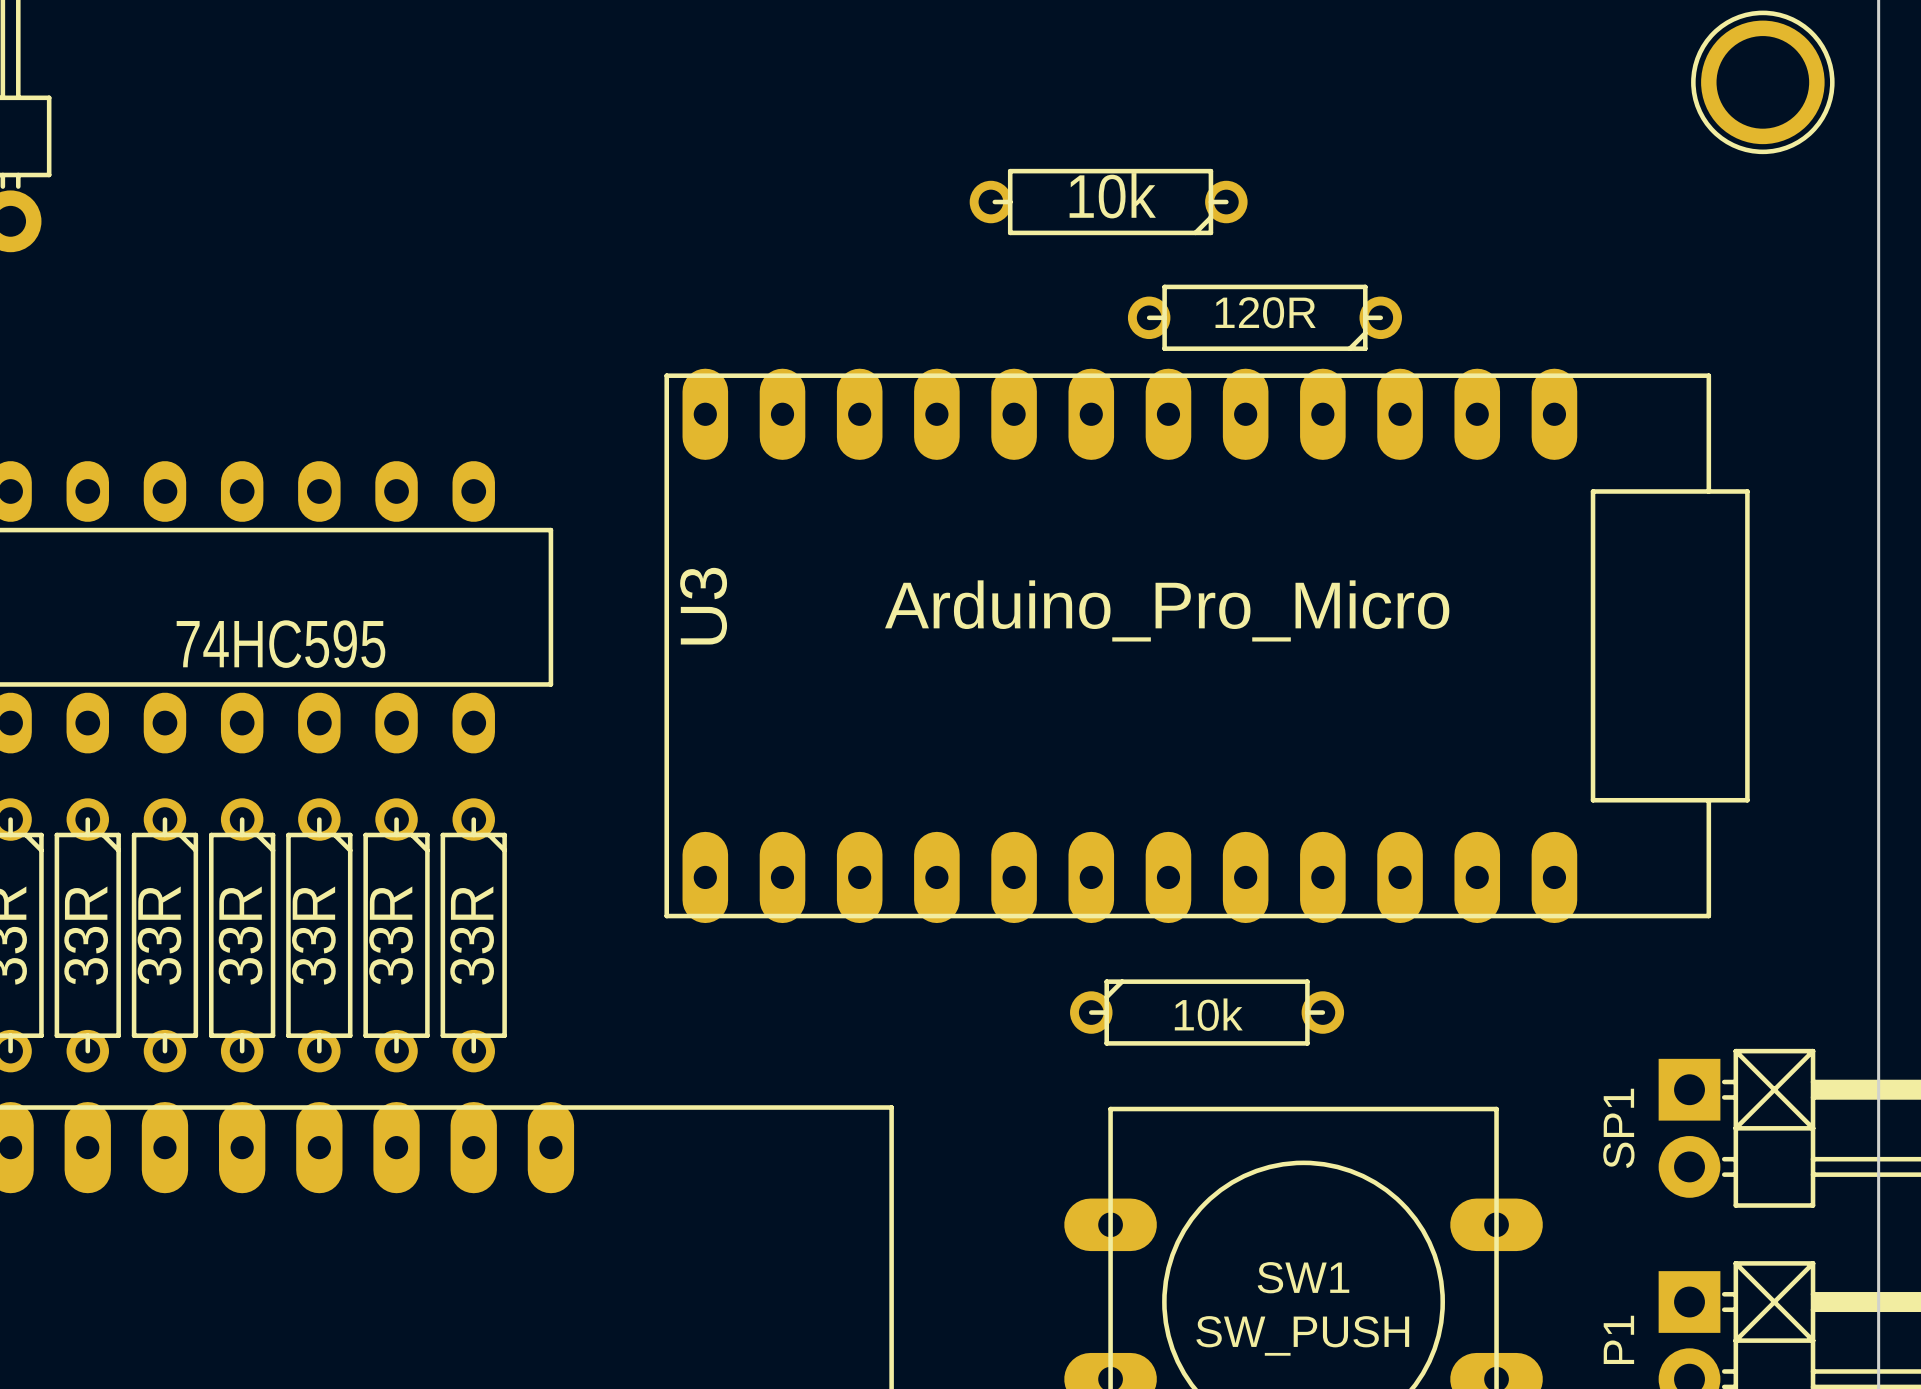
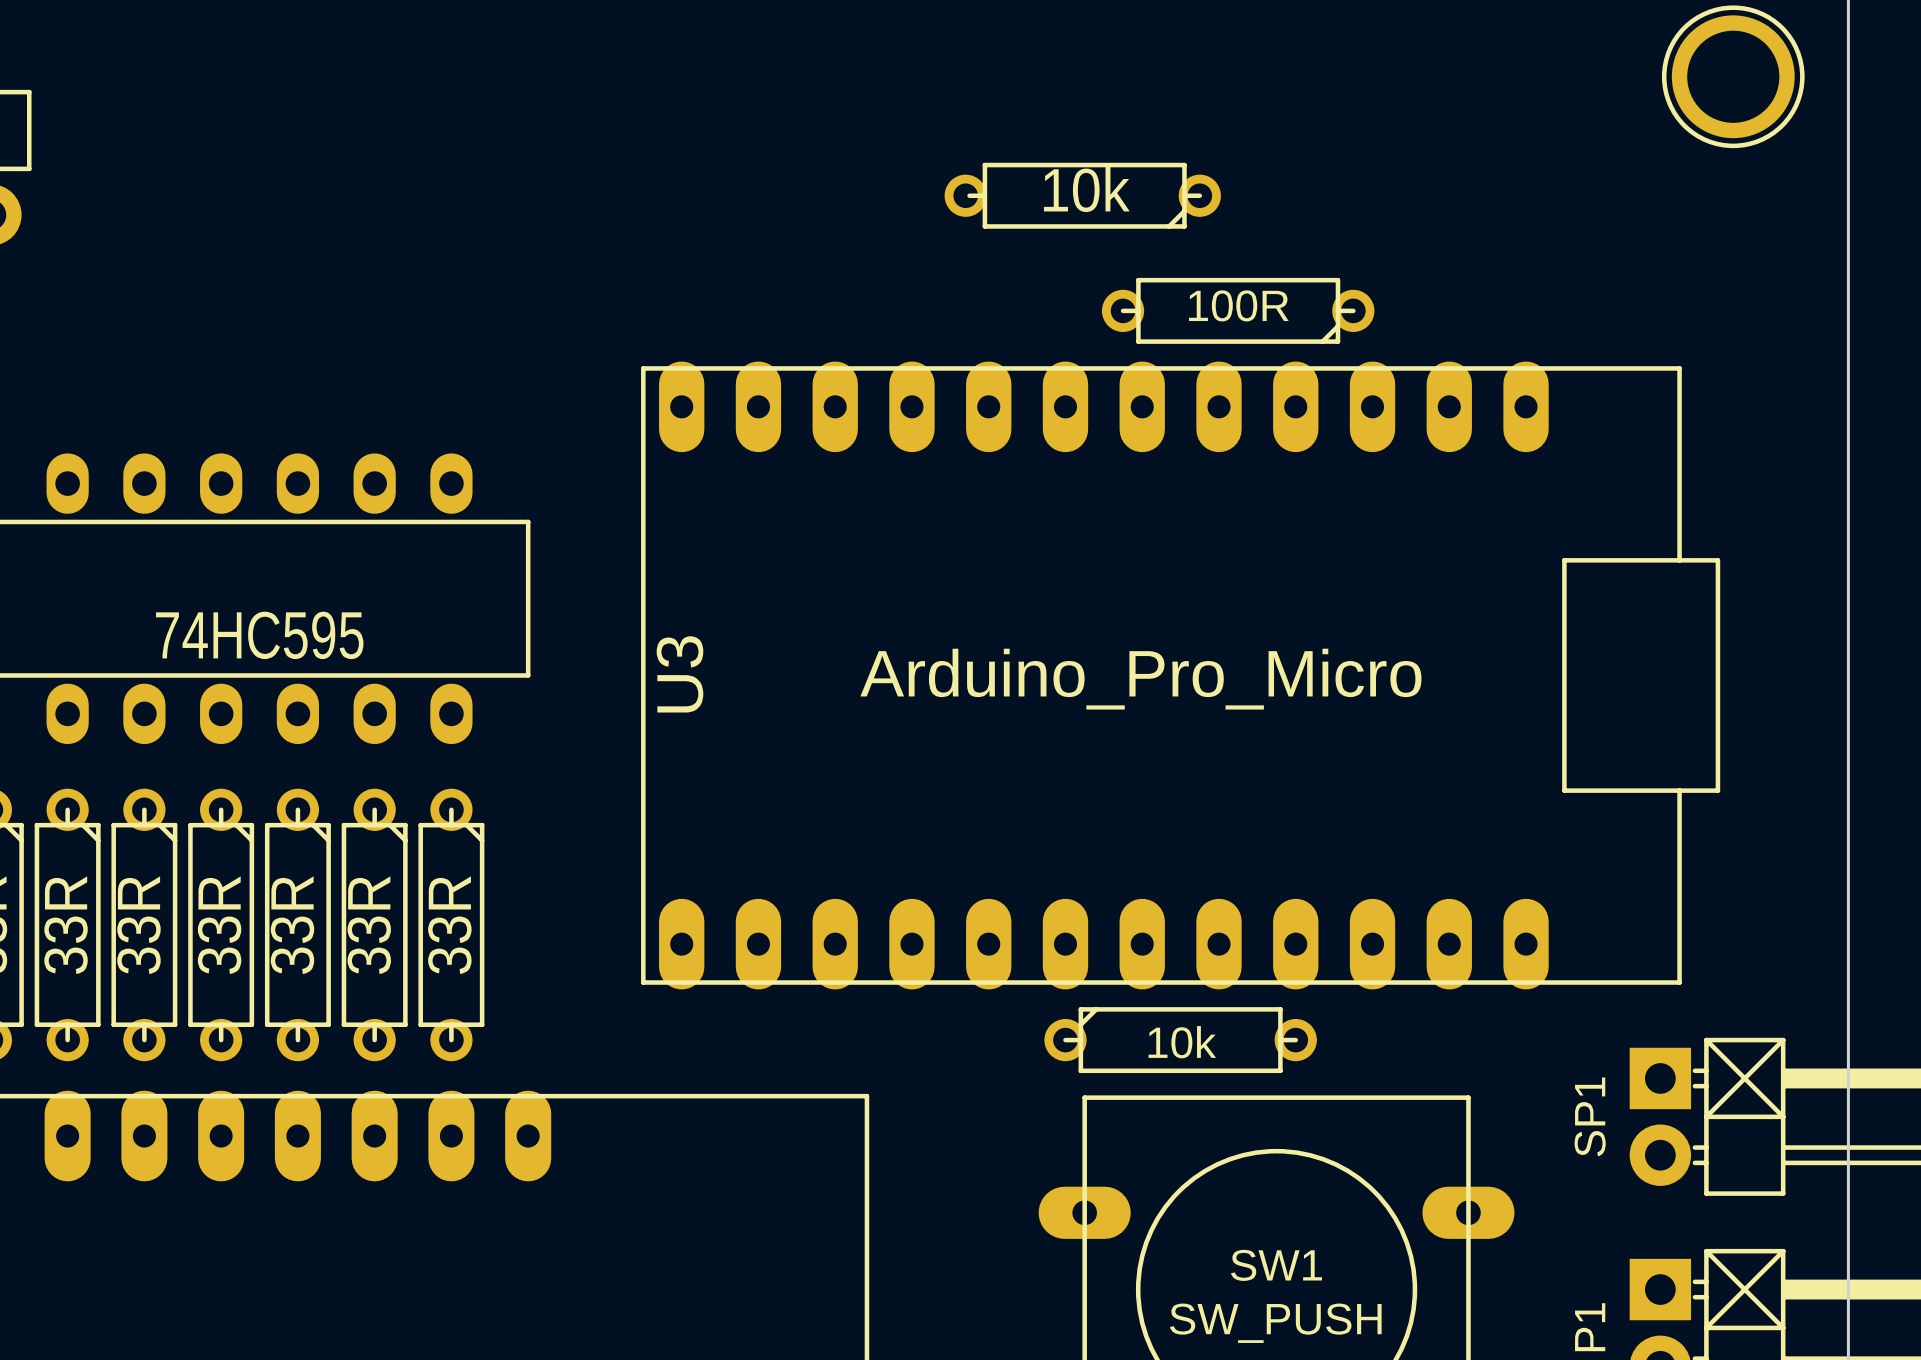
part value: 120R (1265, 312) -> 100R (1238, 305)
U3 footprint: [664, 368, 1750, 924] -> [641, 361, 1721, 990]
part position: (1207, 1012) -> (1180, 1040)

